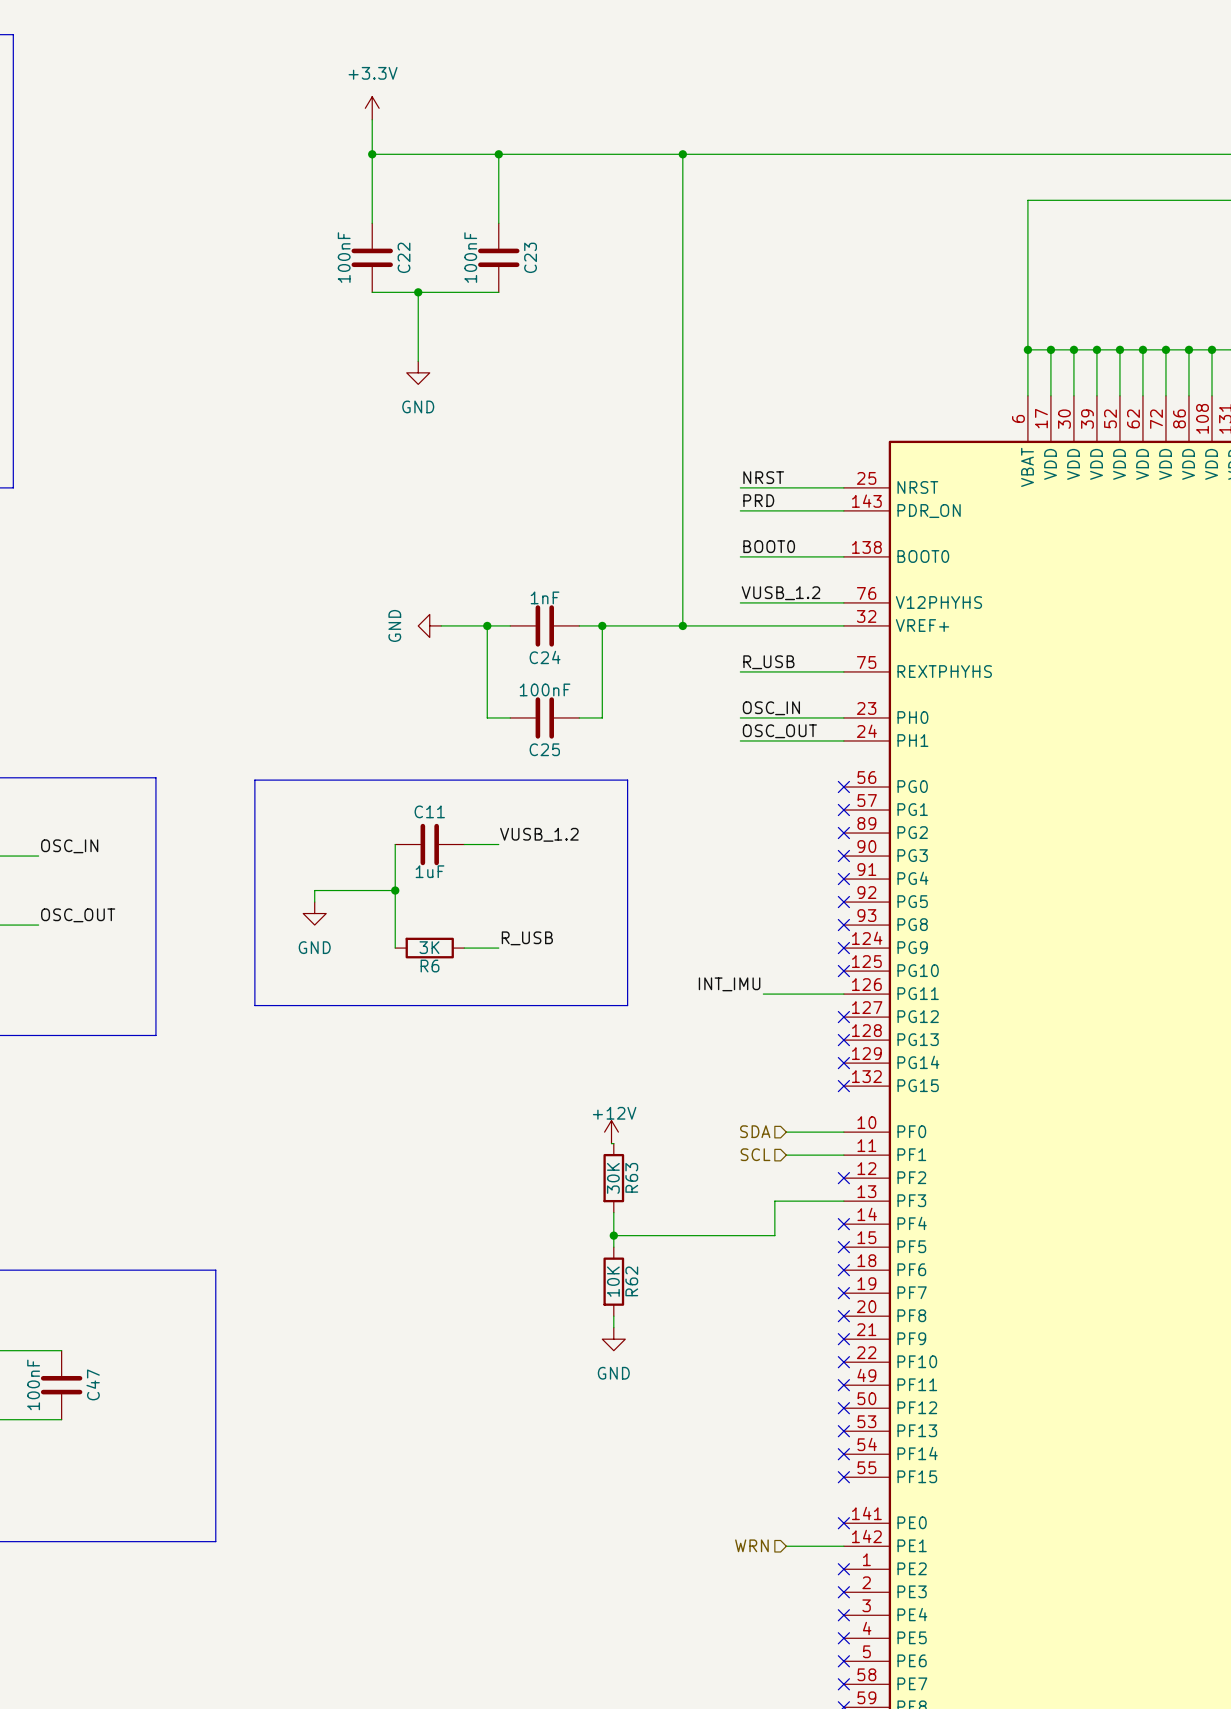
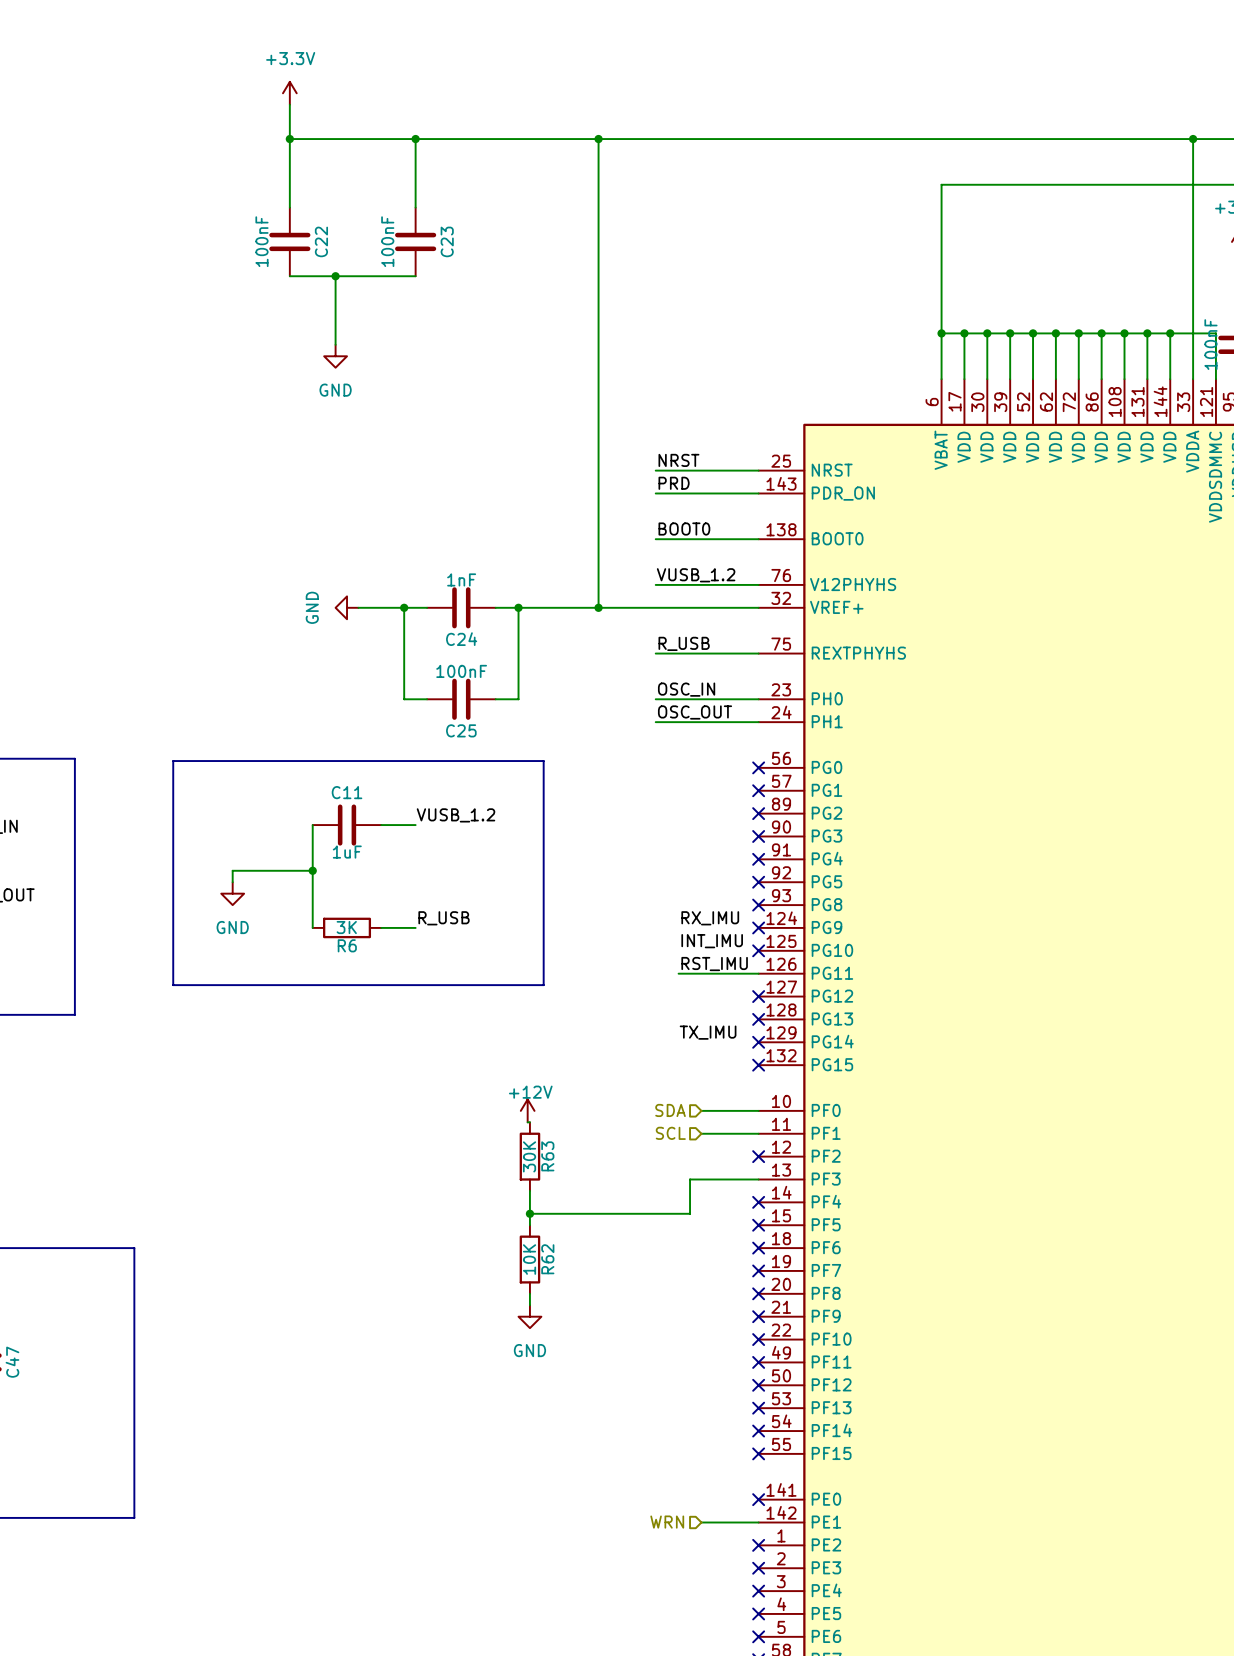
label: none -> RX_IMU (710, 918)
label: none -> INT_IMU (712, 941)
label: INT_IMU (729, 984) -> RST_IMU (714, 964)
label: none -> TX_IMU (708, 1032)

